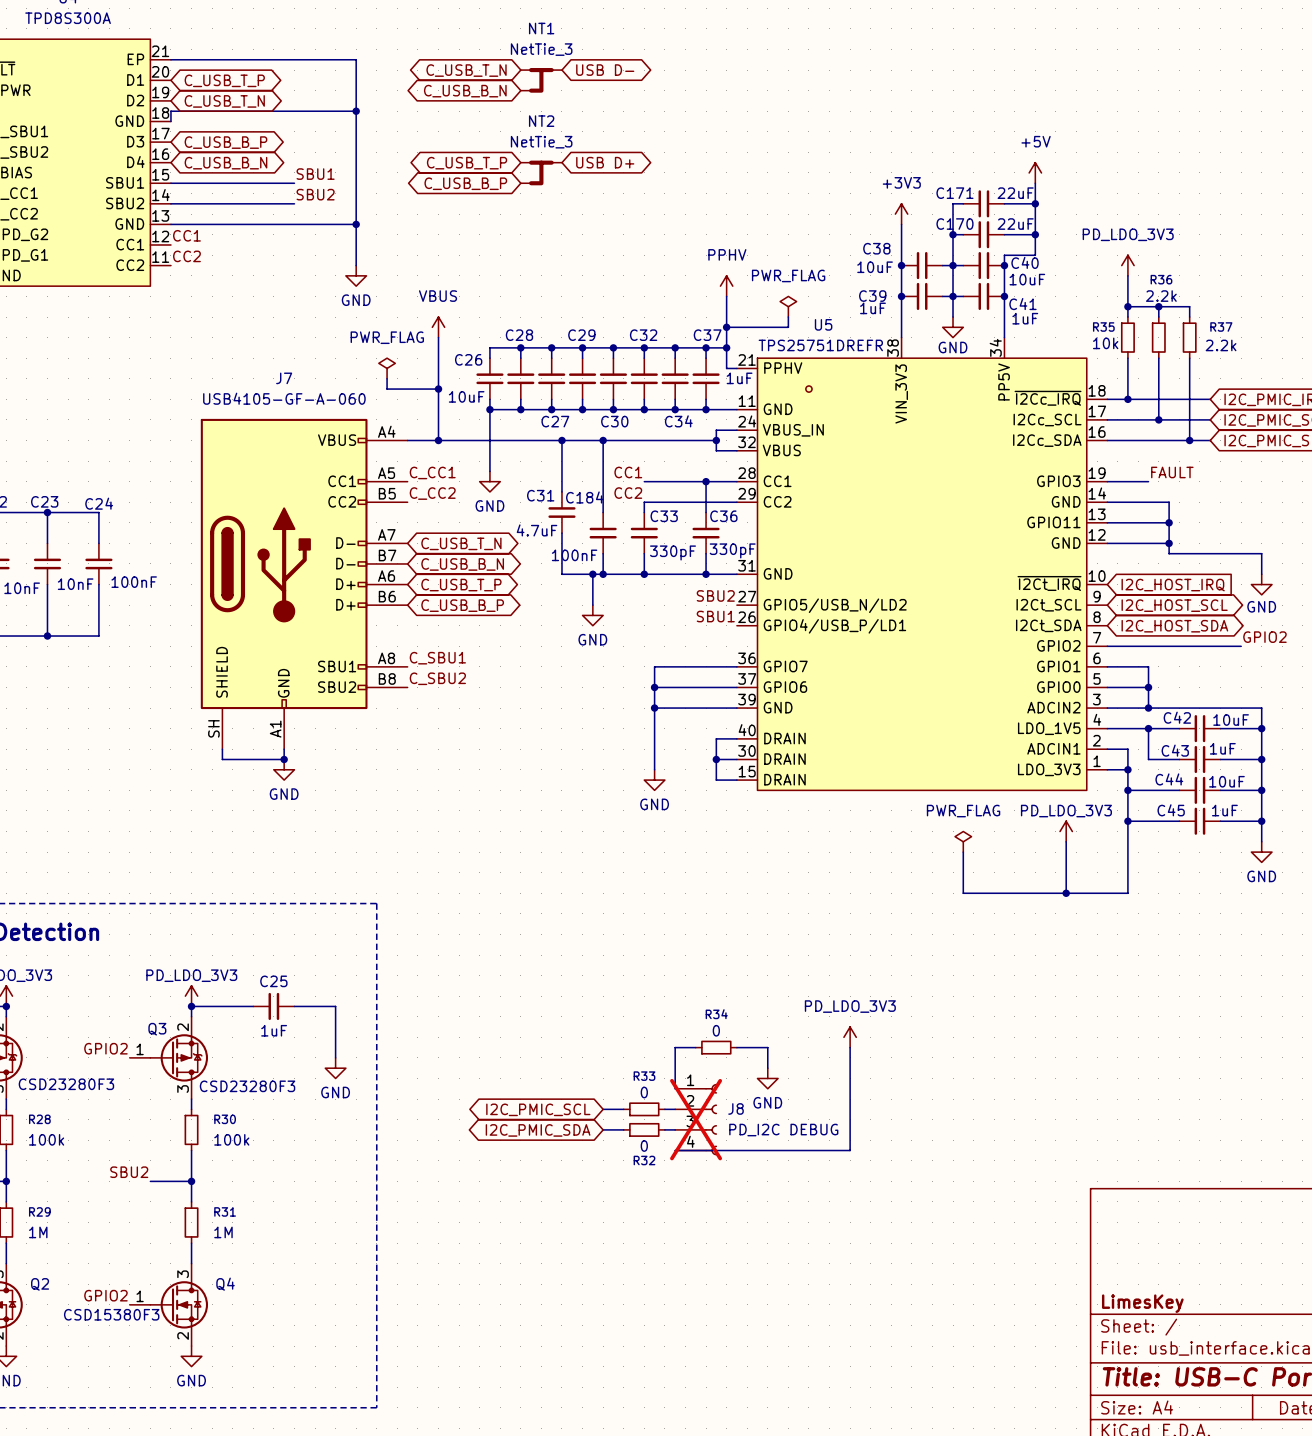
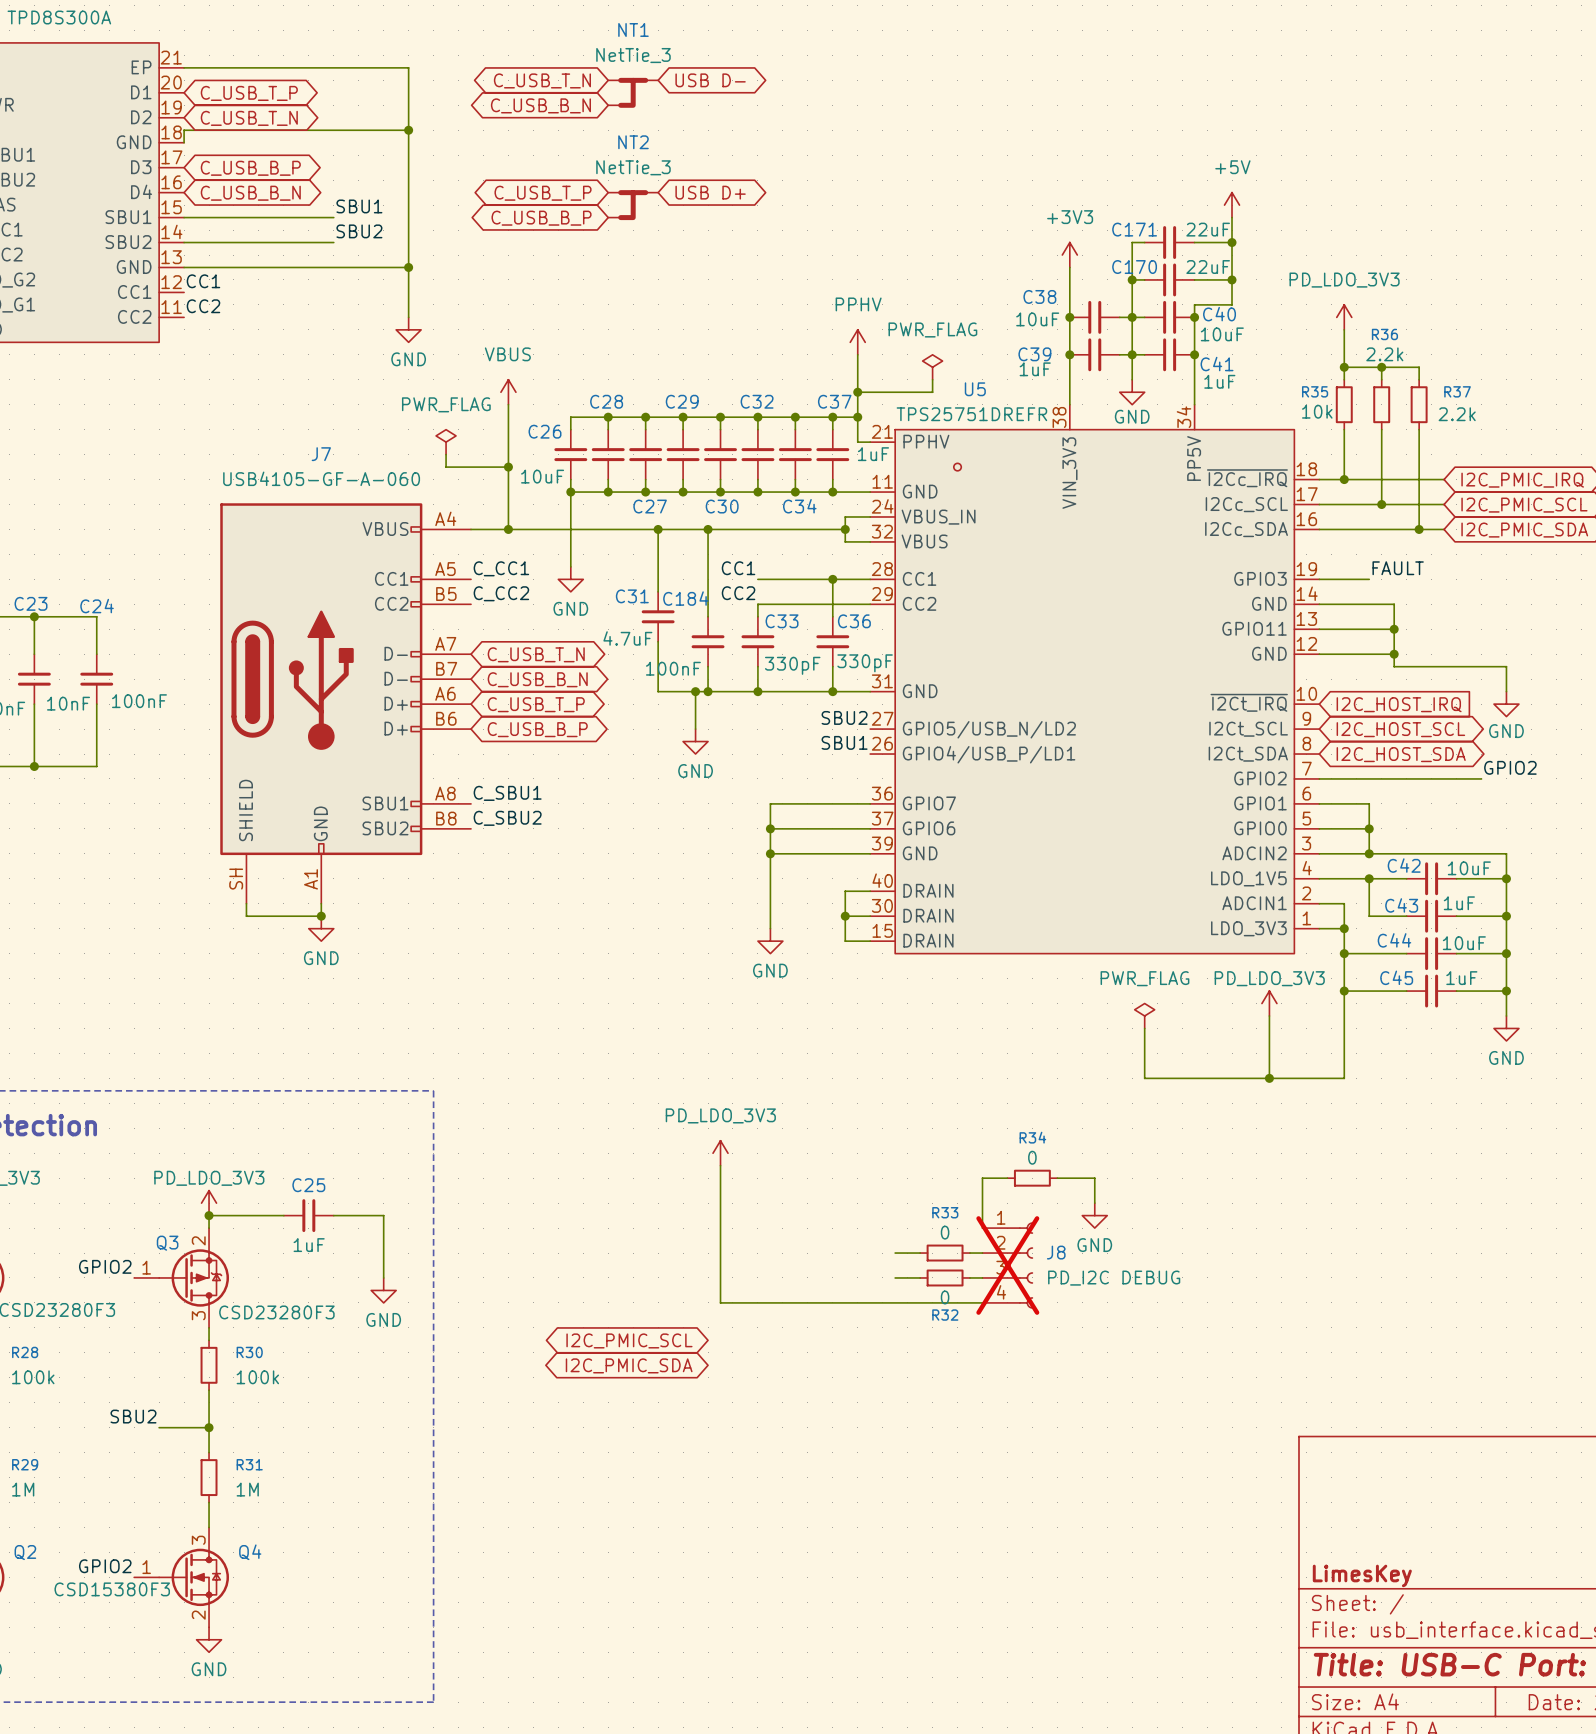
power symbol: none -> PD_LDO_3V3 (720, 1153)
wire: none -> (720, 1165) (720, 1302) (982, 1302)
power symbol: PD_LDO_3V3 (850, 1037) -> none
wire: (695, 1047) (675, 1047) (675, 1088) -> (1007, 1178) (982, 1178) (982, 1228)
R34 position: (716, 1047) -> (1032, 1178)
wire: (736, 1047) (767, 1047) (767, 1068) -> (1057, 1178) (1094, 1178) (1094, 1203)
wire: (850, 1047) (850, 1150) (675, 1150) -> none
power symbol position: GND (767, 1078) -> GND (1094, 1215)
wire: (603, 1109) (623, 1109) -> (895, 1253) (920, 1253)
R32 position: (644, 1109) -> (945, 1253)
wire: (664, 1109) (675, 1109) -> (970, 1253) (982, 1253)
J8 position: (696, 1119) -> (1007, 1265)
wire: (603, 1129) (623, 1129) -> (895, 1277) (920, 1277)
R33 position: (644, 1129) -> (945, 1277)
wire: (664, 1129) (675, 1129) -> (970, 1277) (982, 1277)

